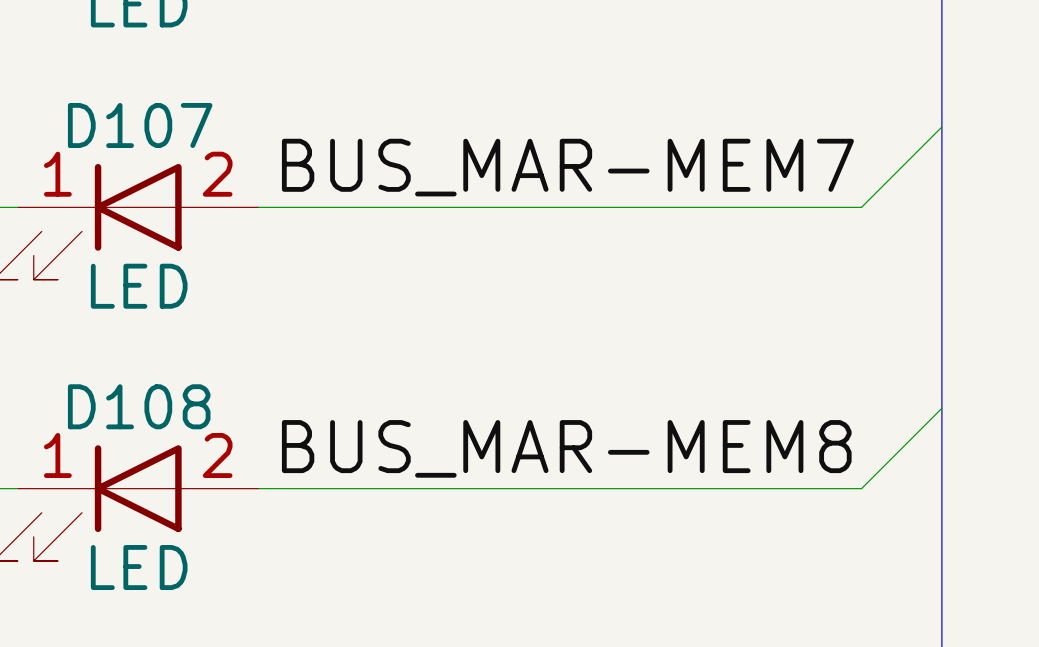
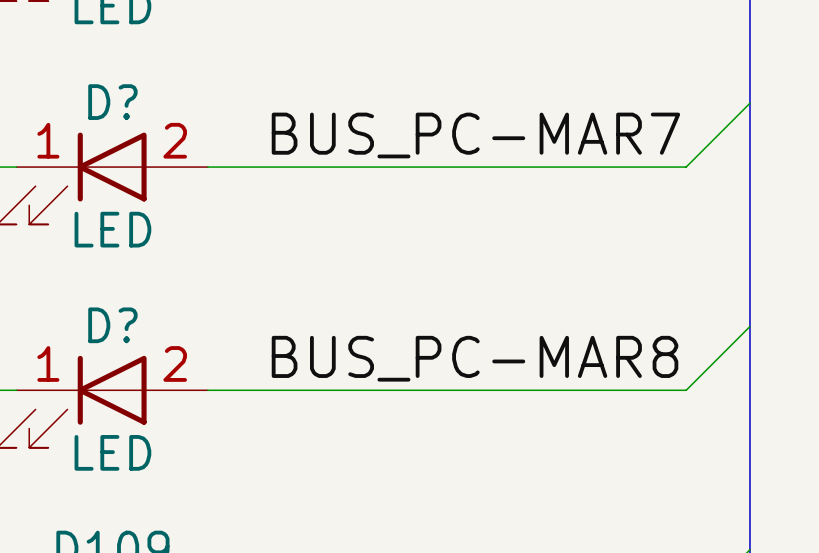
D107 name: D107 (140, 125) -> D? (112, 102)
label: BUS_MAR-MEM7 (567, 167) -> BUS_PC-MAR7 (475, 135)
D108 name: D108 (139, 406) -> D? (112, 325)
label: BUS_MAR-MEM8 (566, 448) -> BUS_PC-MAR8 (475, 358)

